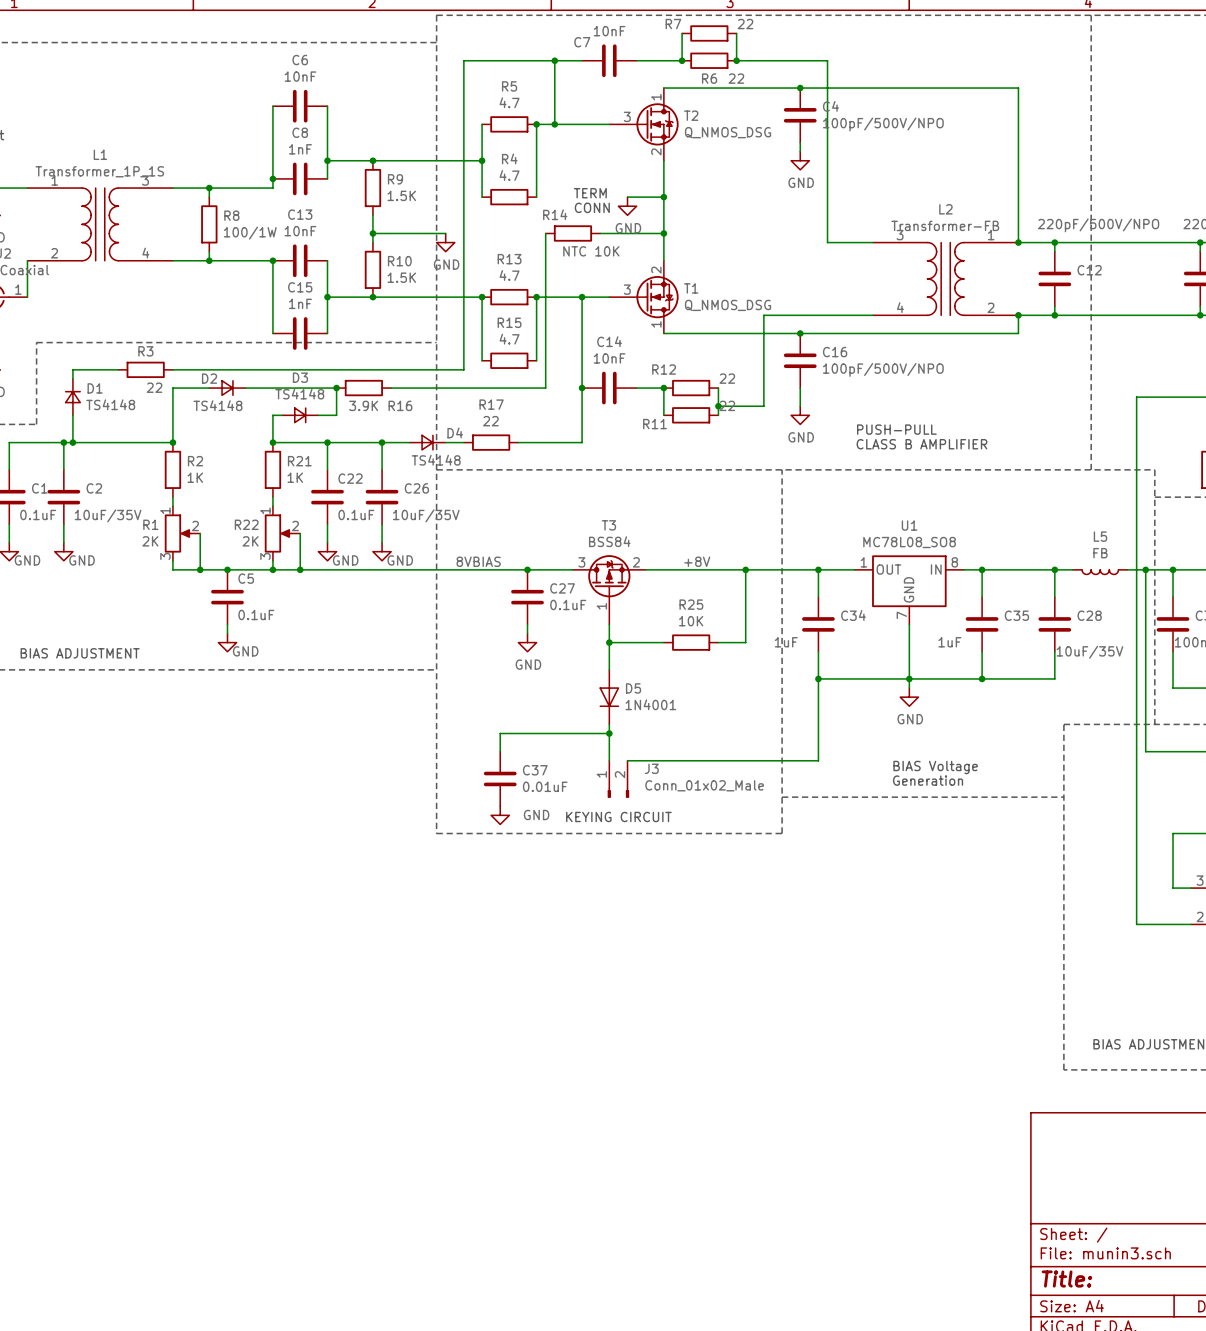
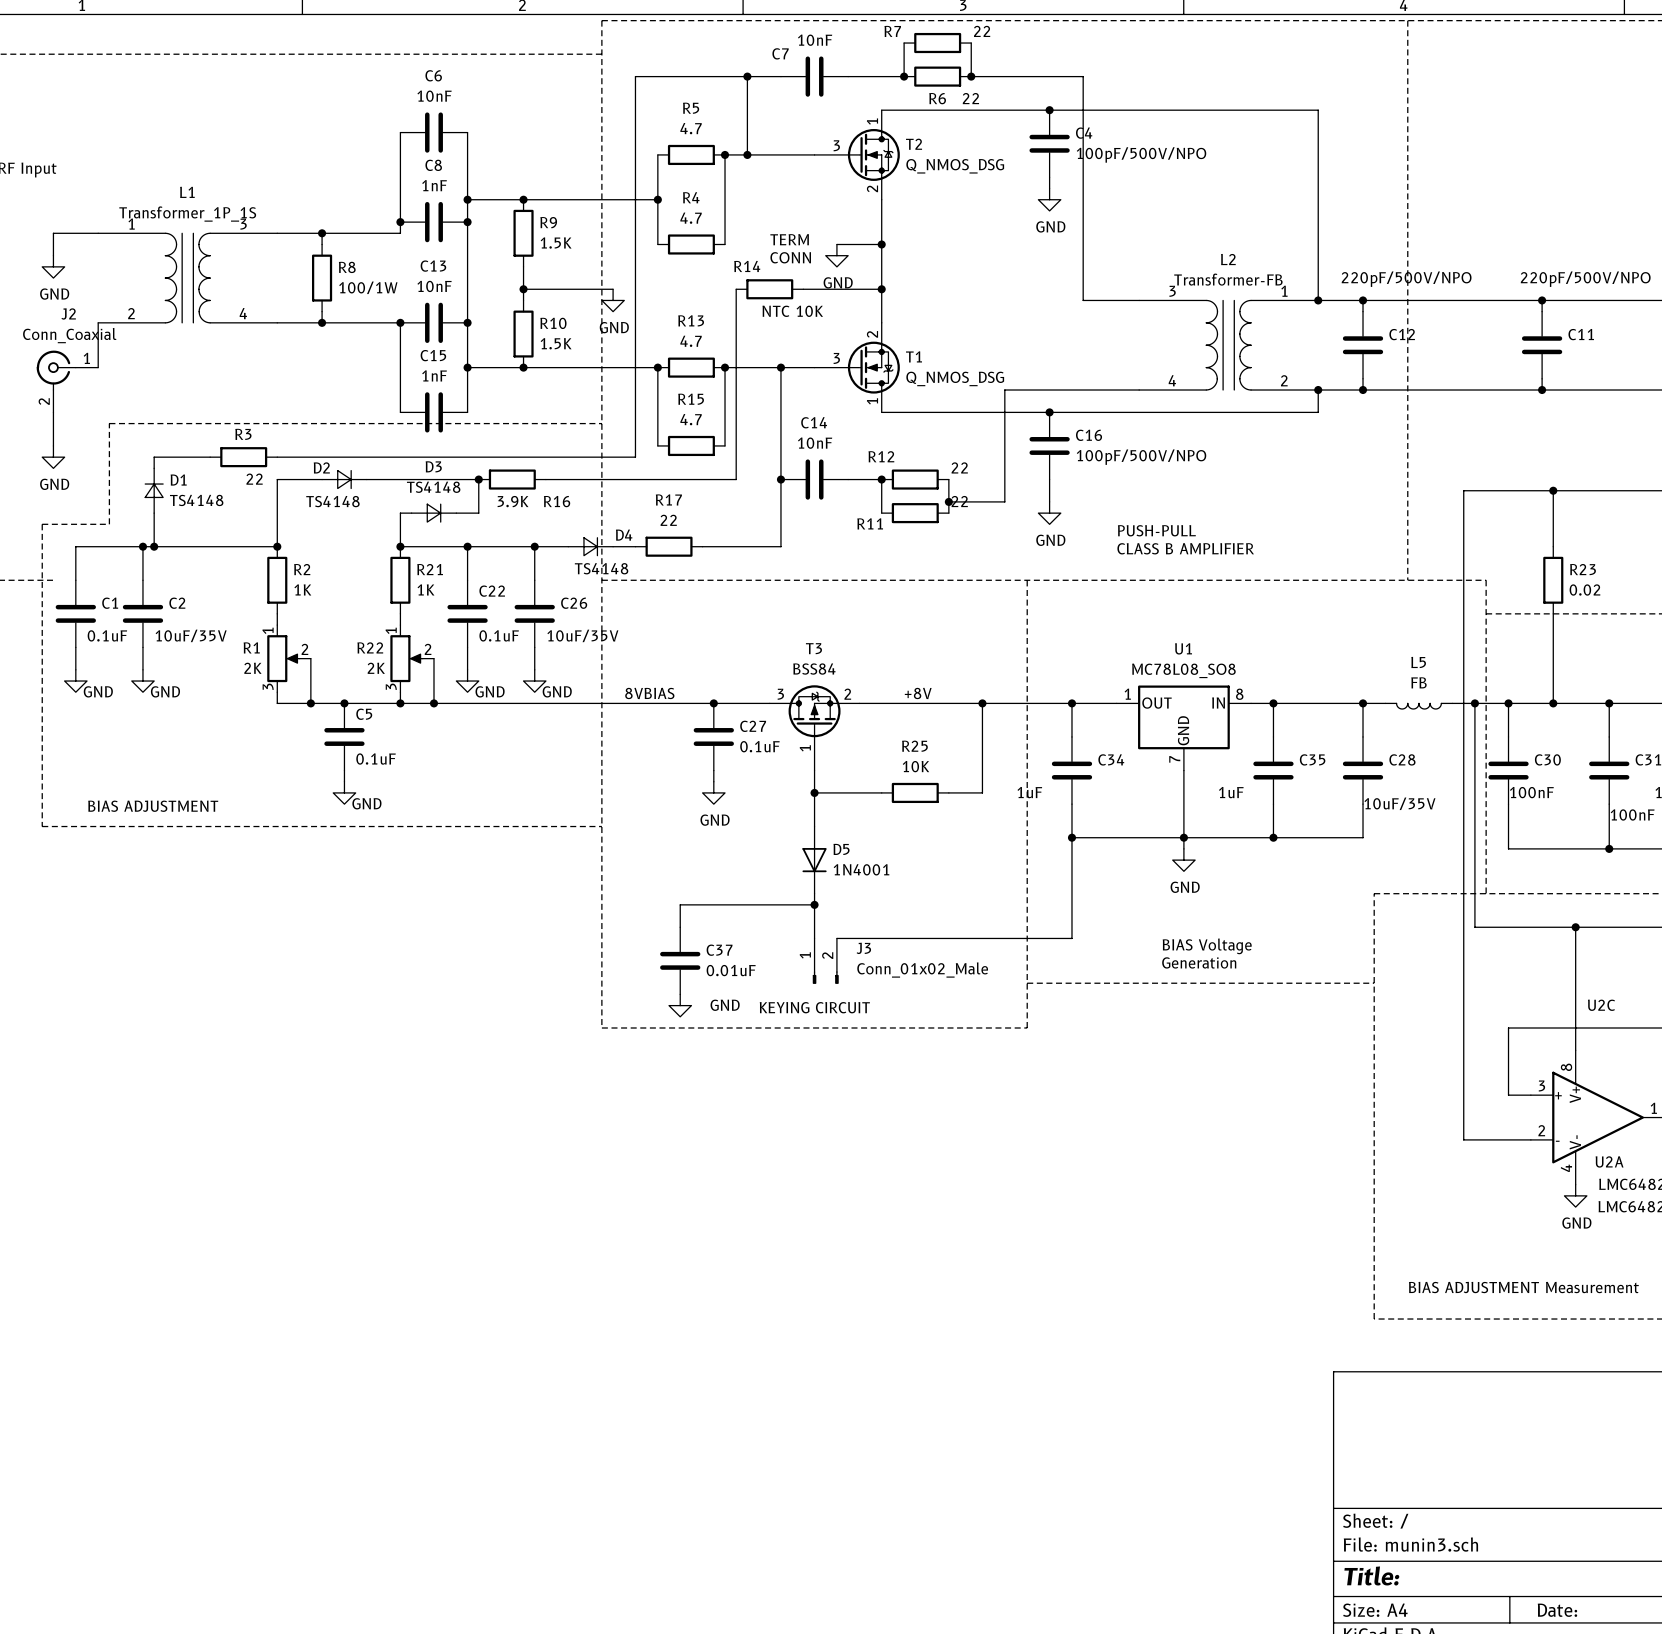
wire: none -> (467, 222) (467, 322)
junction: none -> (467, 222)
junction: none -> (467, 322)

